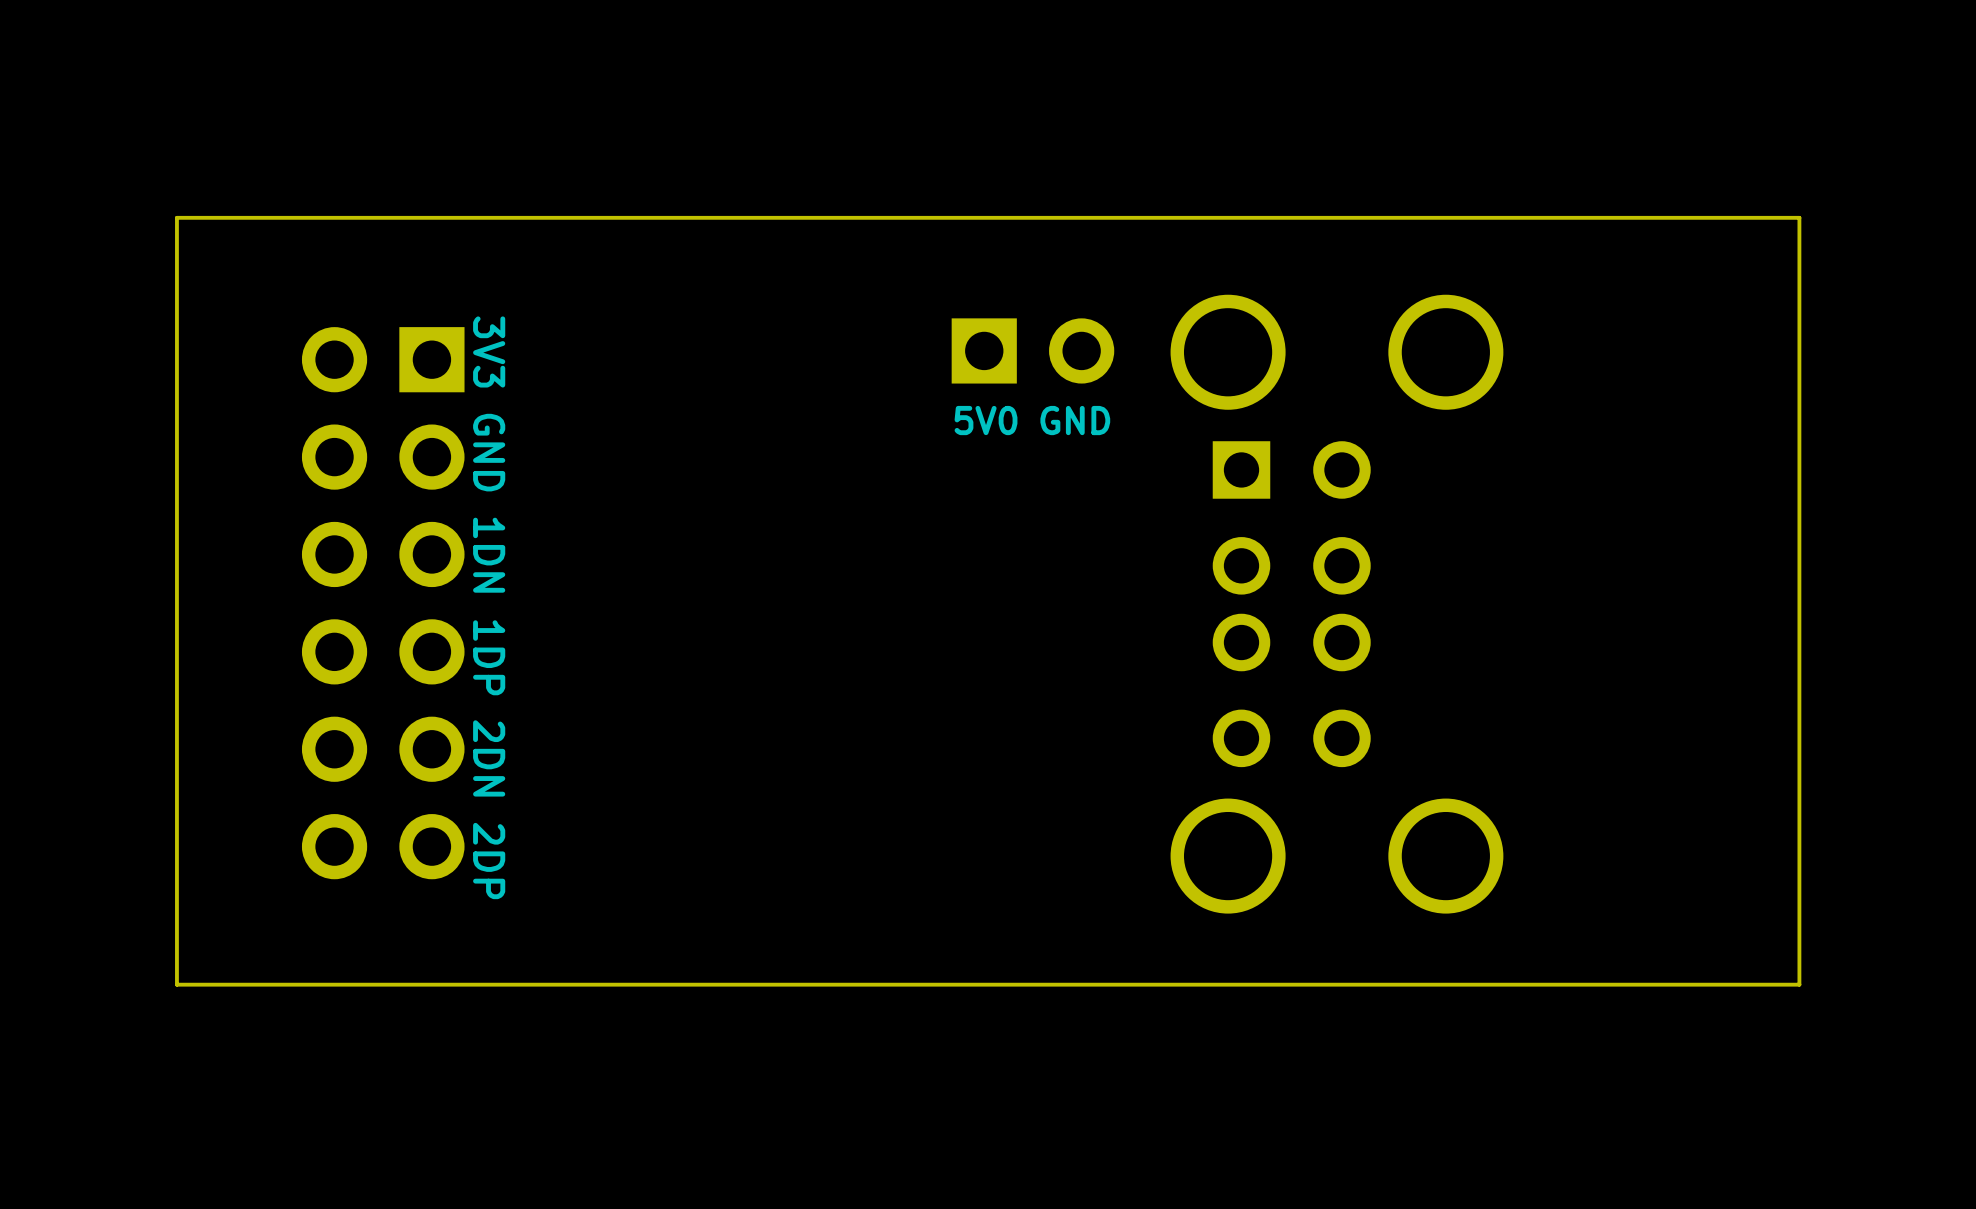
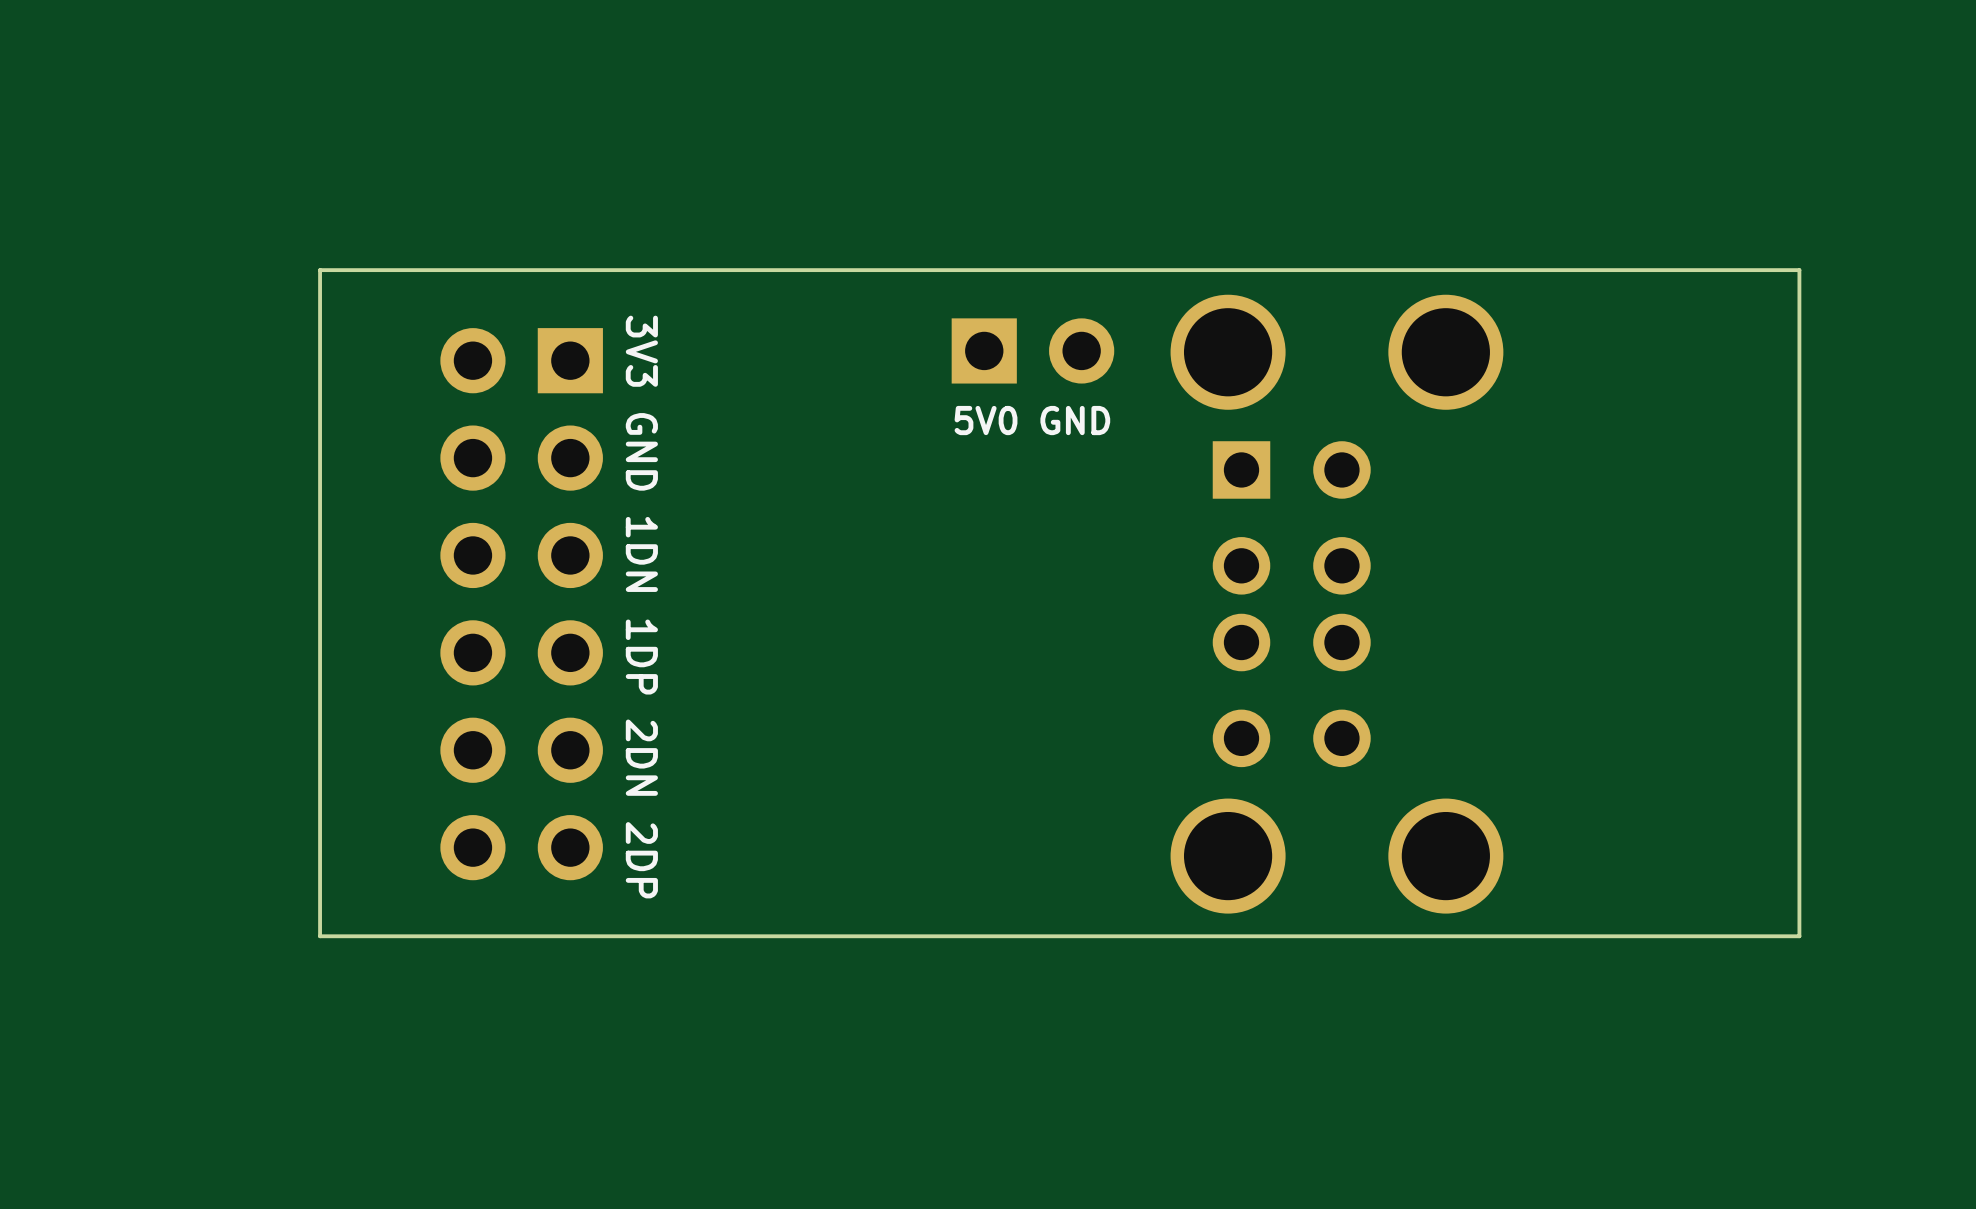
board edge: (1799, 270) (1799, 217) (176, 217) (176, 984) (1799, 984) (1799, 936) -> (1799, 270) (320, 270) (320, 936) (1799, 936)
part position: (383, 603) -> (521, 604)
text position: 3V3 GND 1DN 1DP 2DN 2DP (489, 607) -> 3V3 GND 1DN 1DP 2DN 2DP (641, 607)

